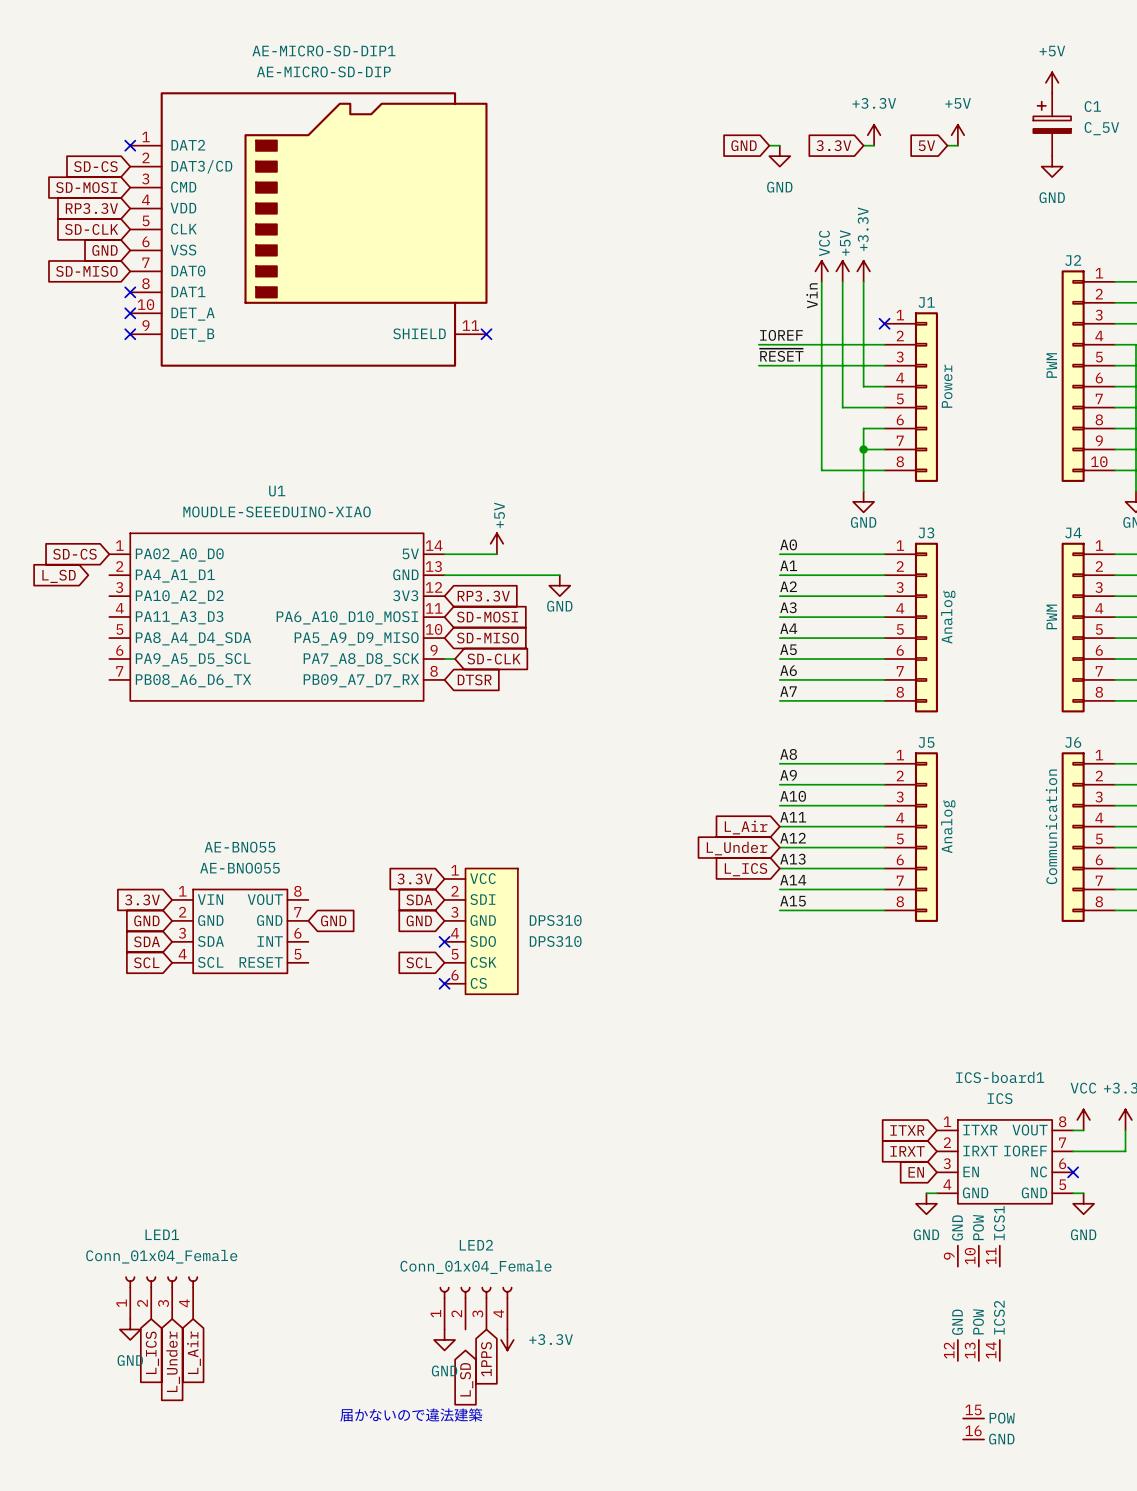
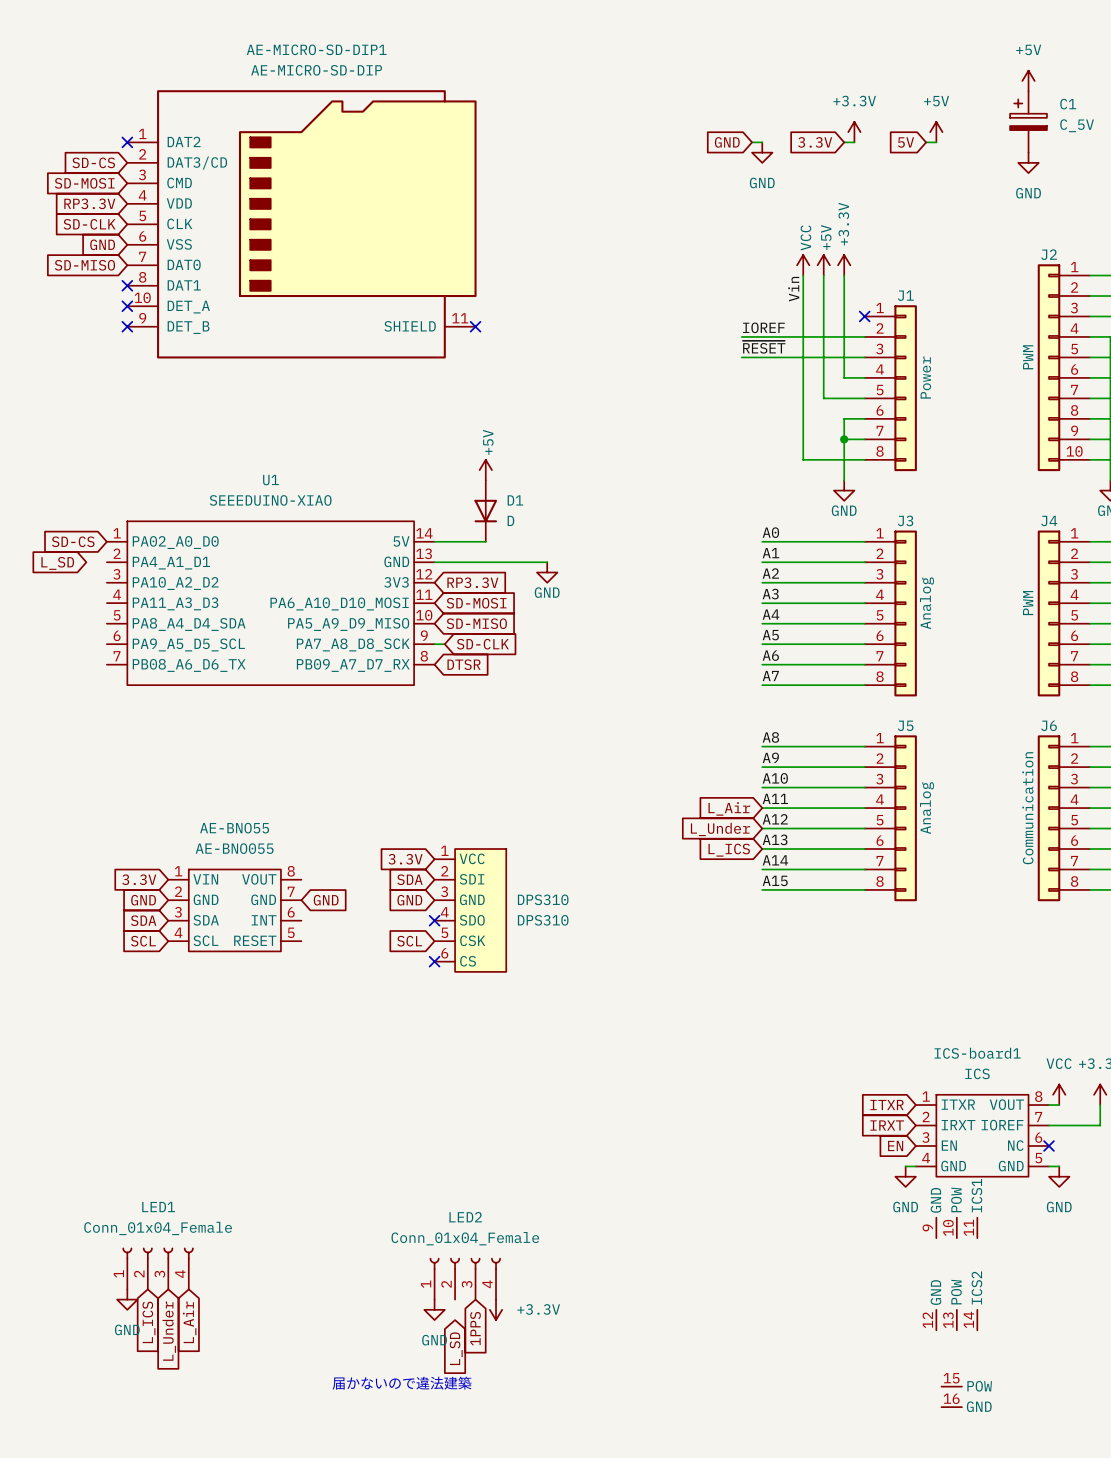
U1 value: MOUDLE-SEEEDUINO-XIAO (277, 511) -> SEEEDUINO-XIAO (270, 500)
D1: none -> D (485, 511)
power symbol position: +5V (496, 543) -> +5V (485, 470)

